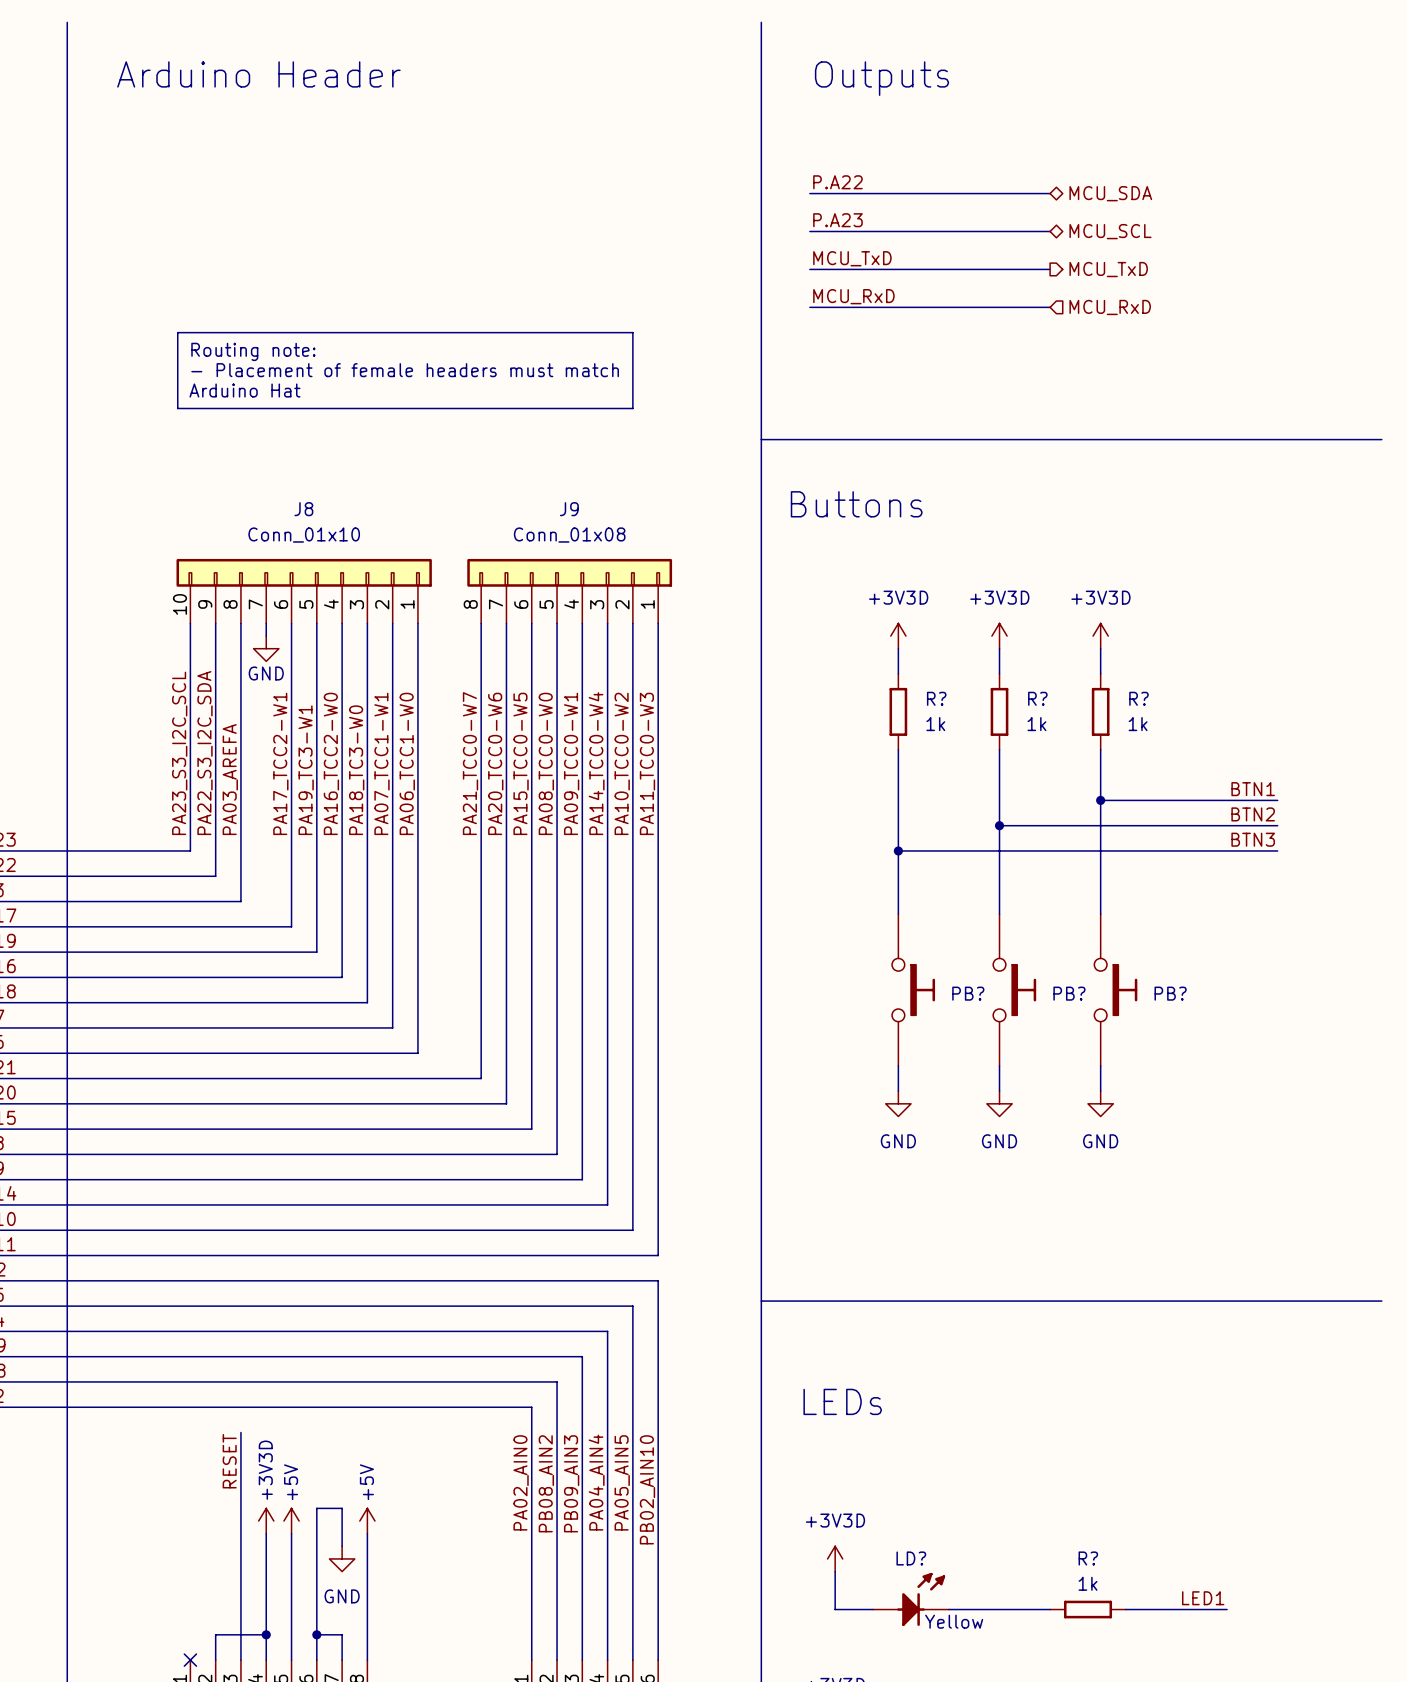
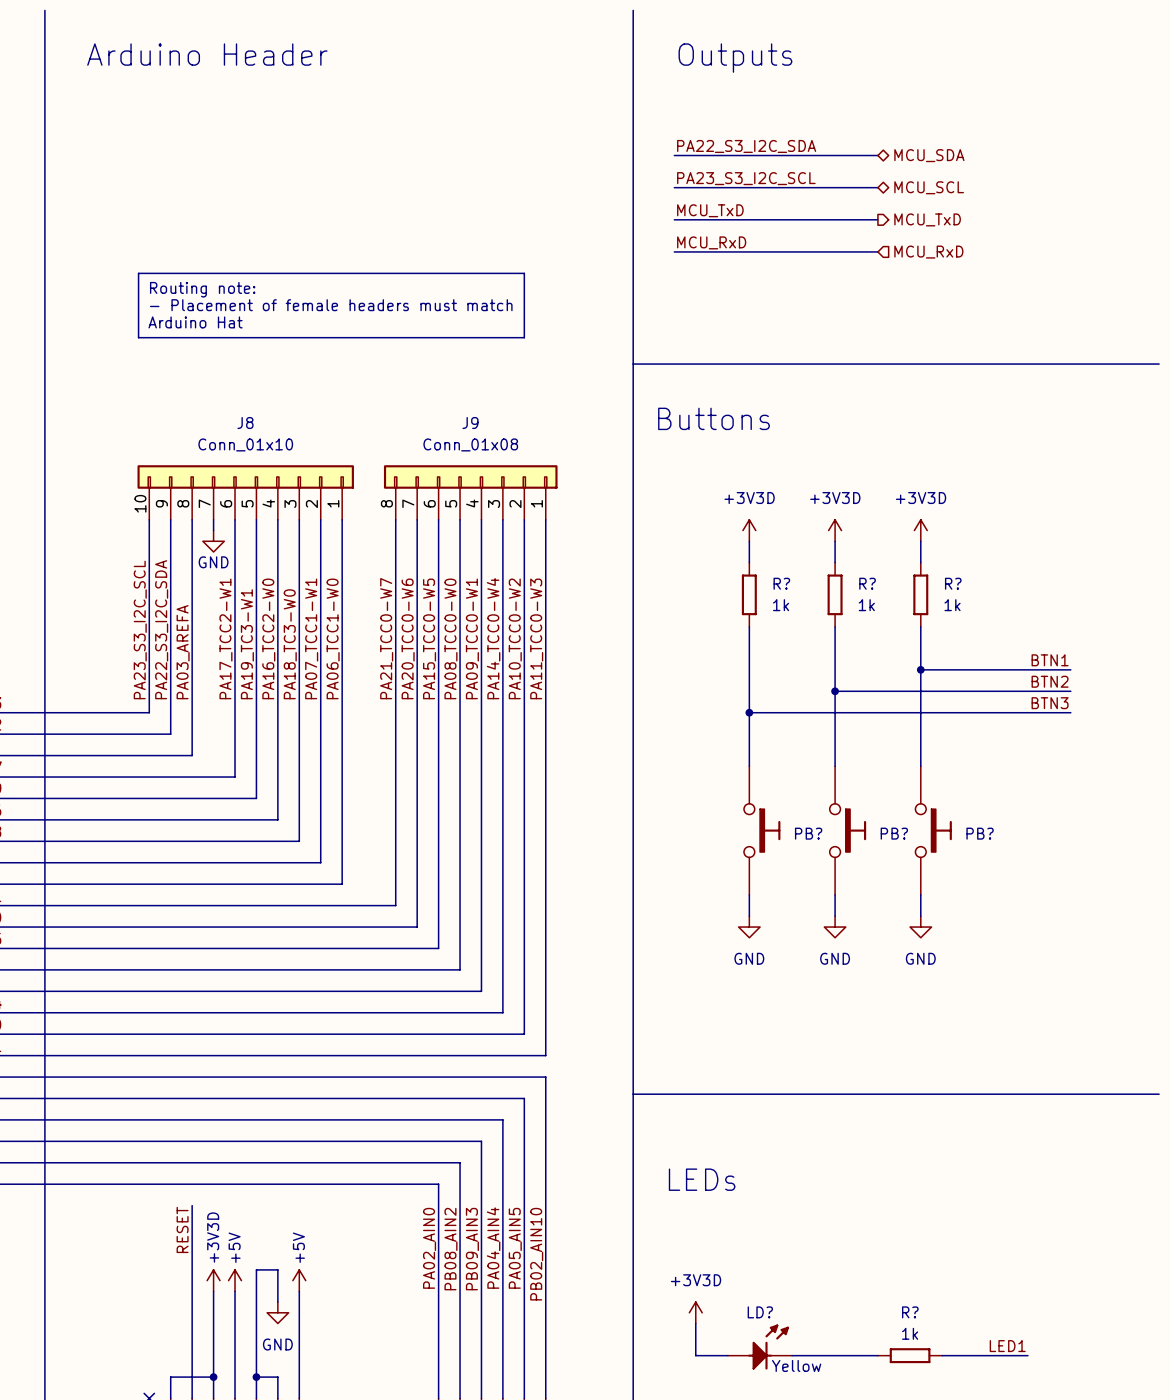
label: P.A22 (837, 182) -> PA22_S3_I2C_SDA (746, 146)
label: P.A23 (837, 220) -> PA23_S3_I2C_SCL (746, 178)

